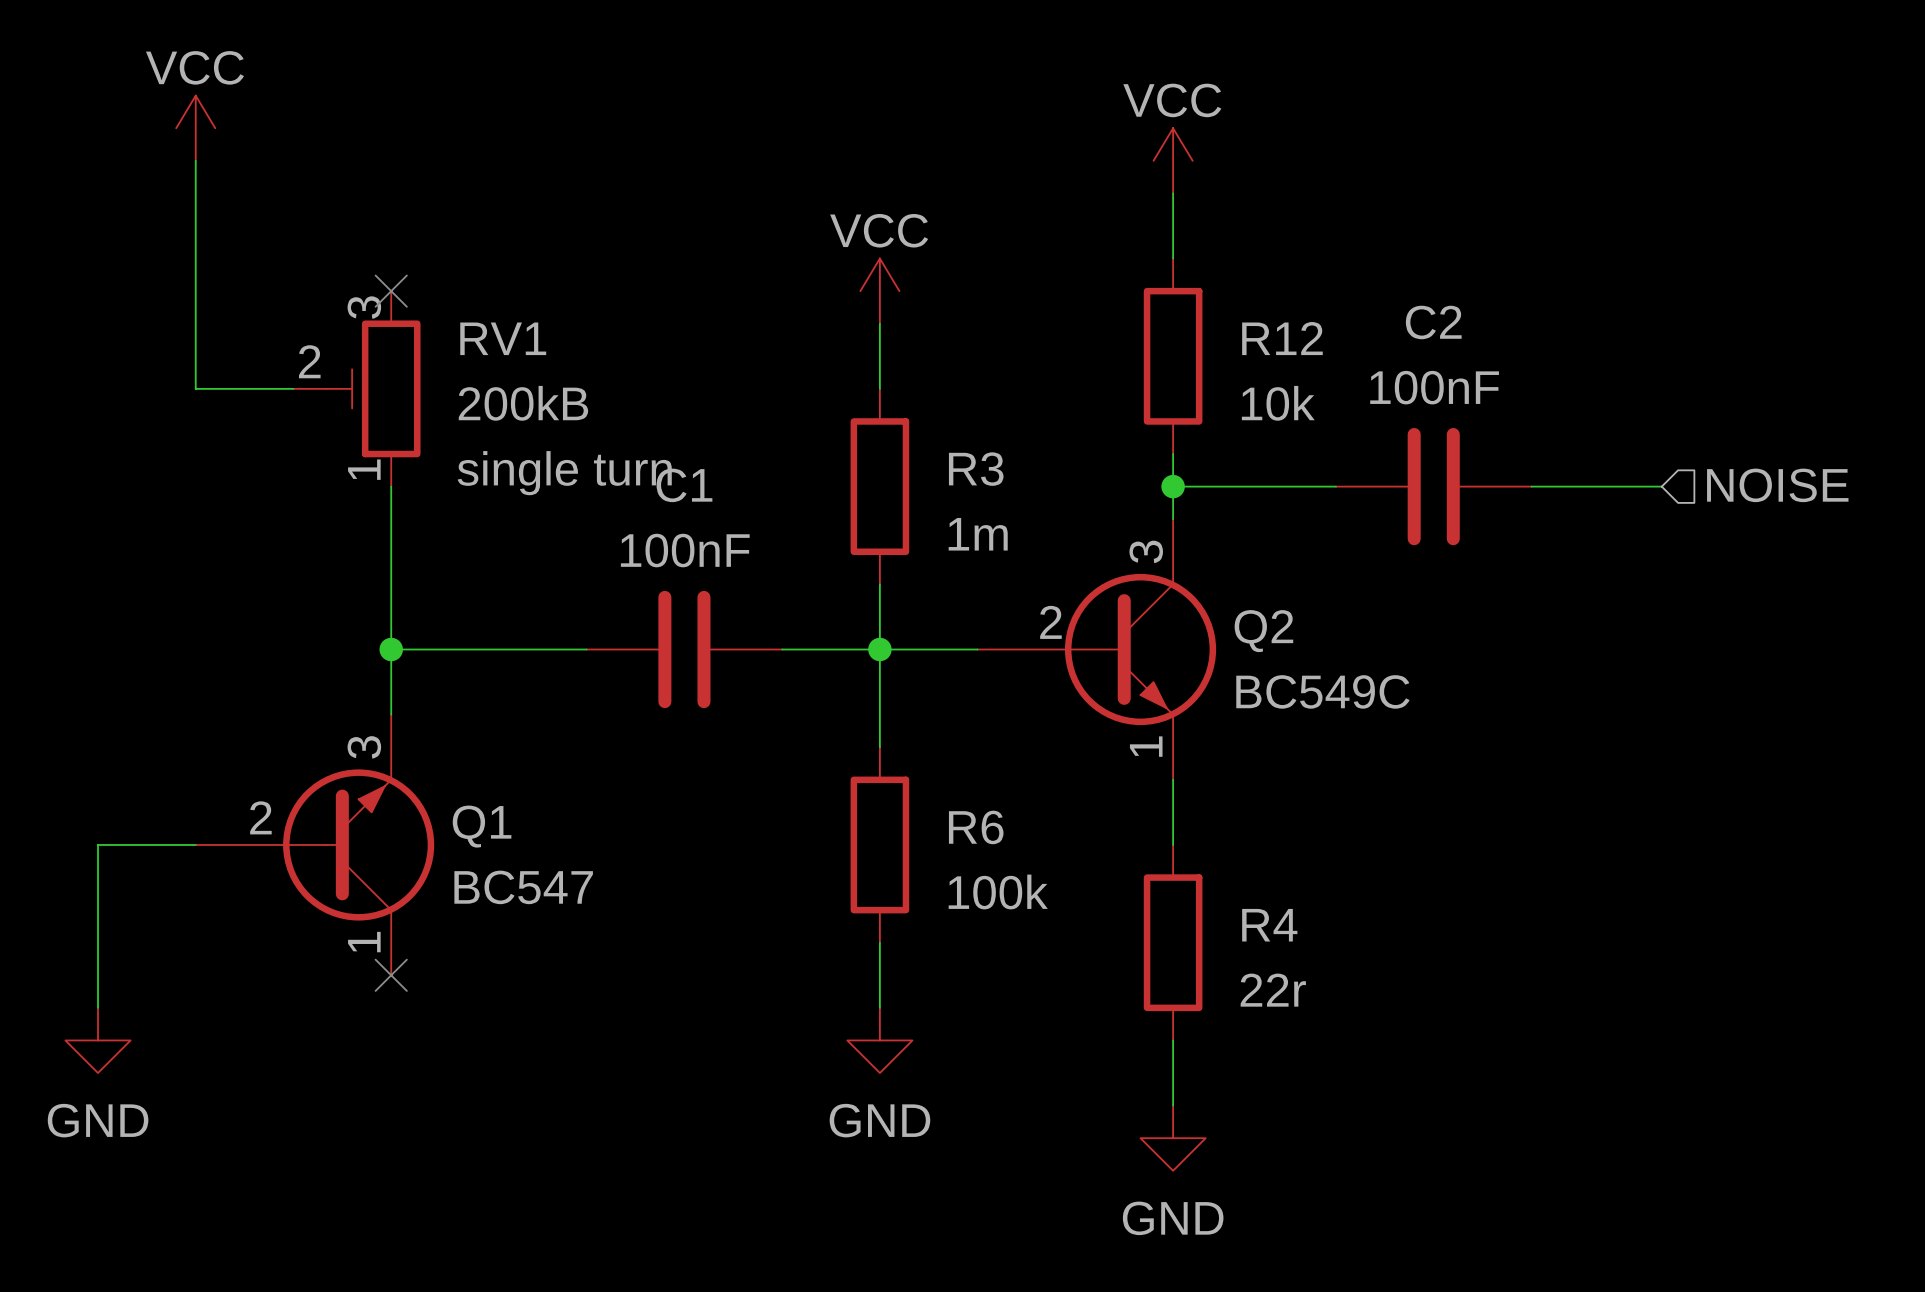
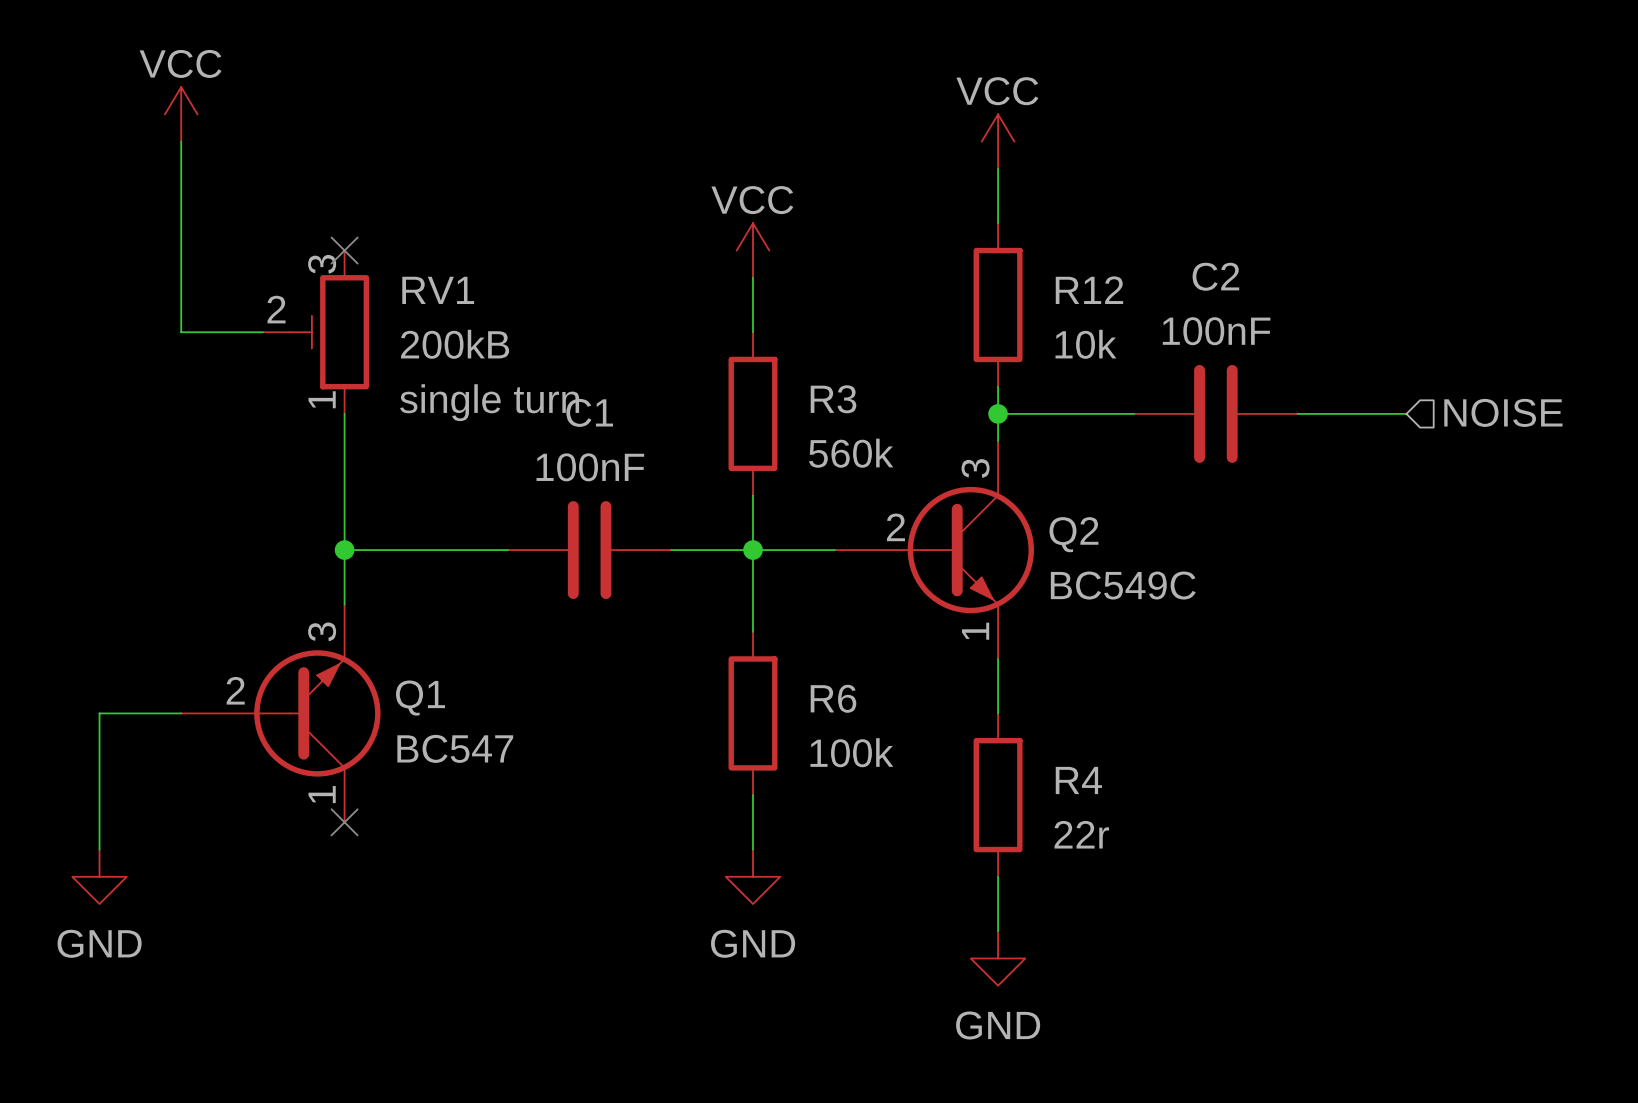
R3 value: 1m (978, 534) -> 560k (851, 453)

